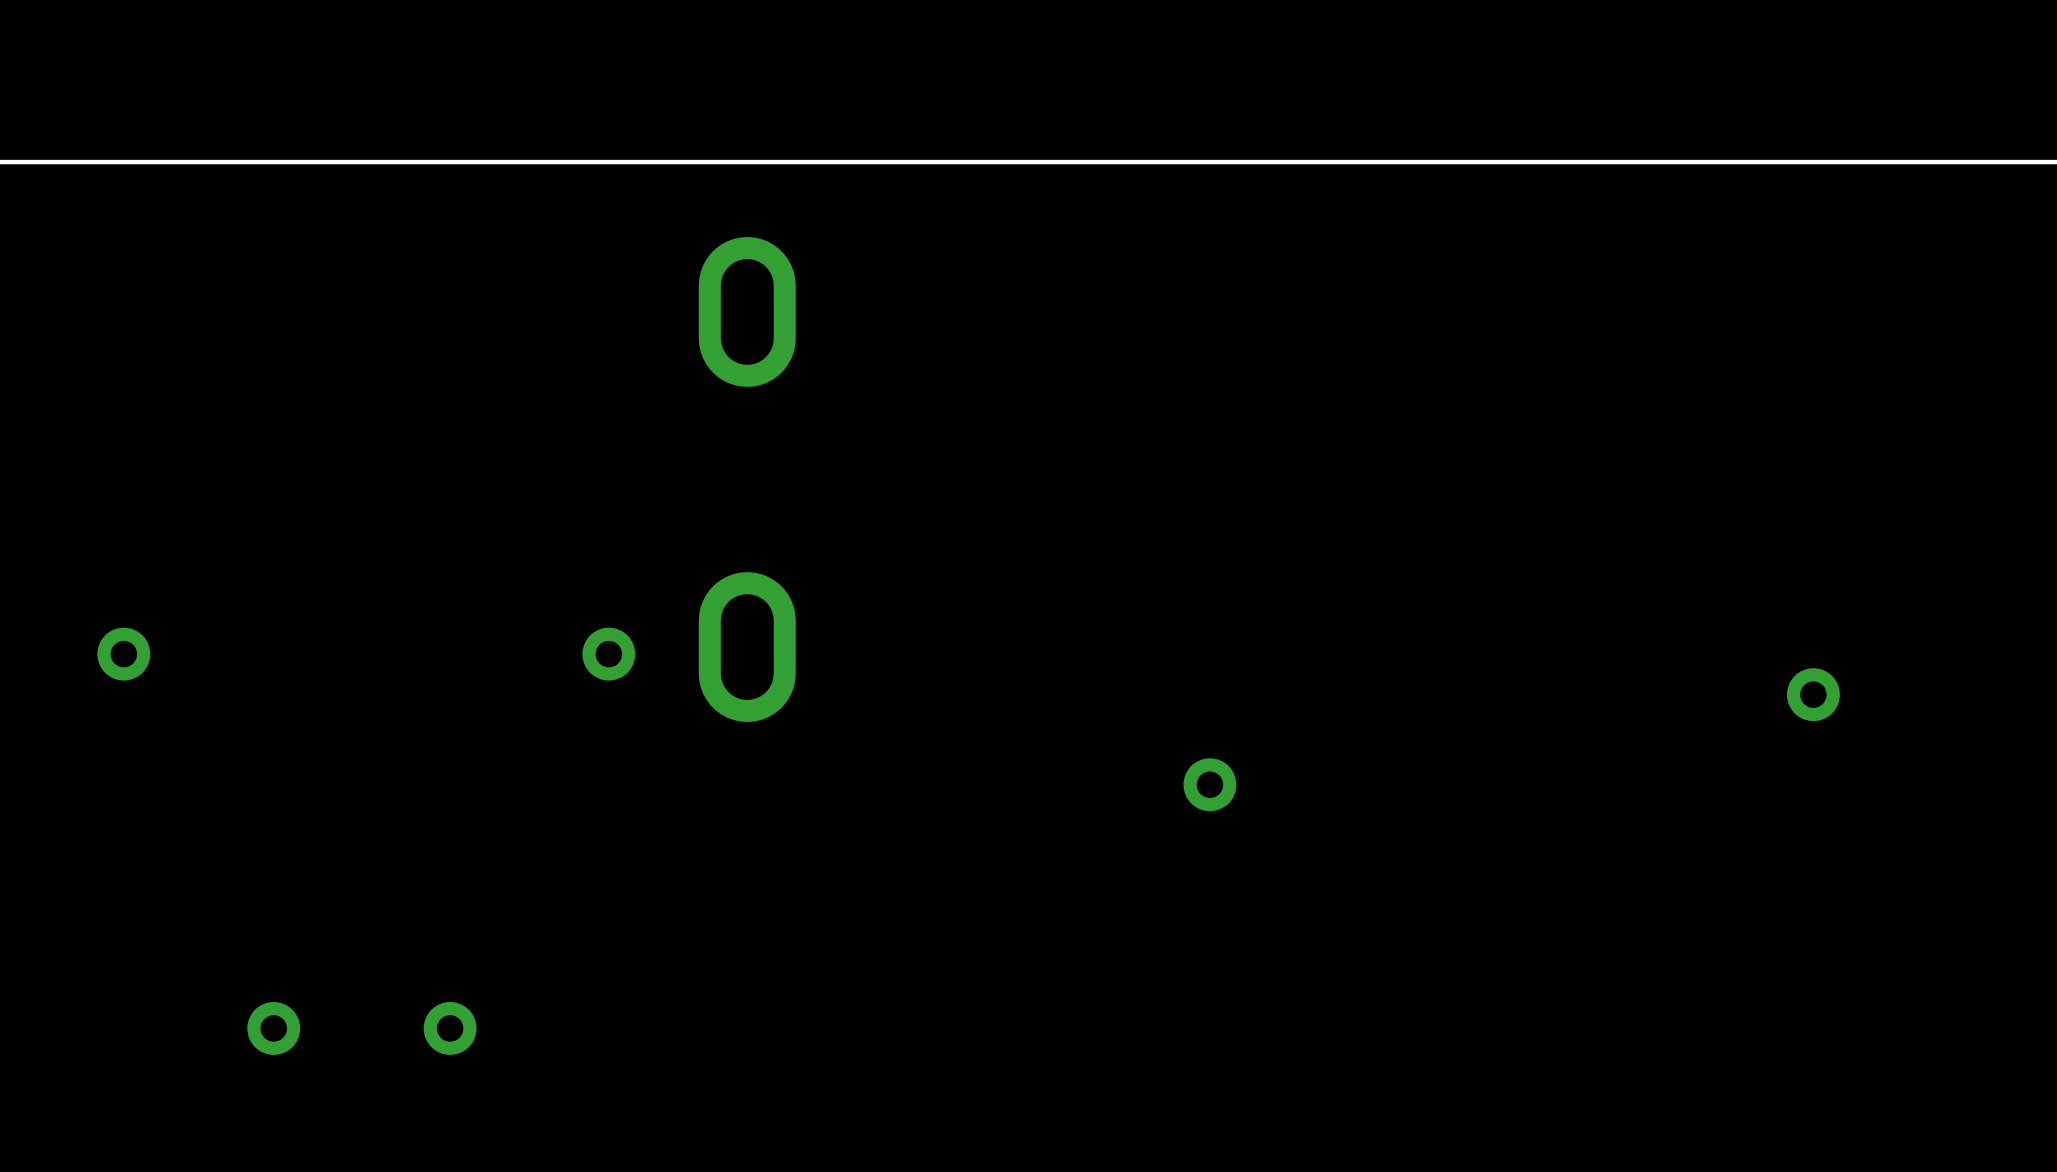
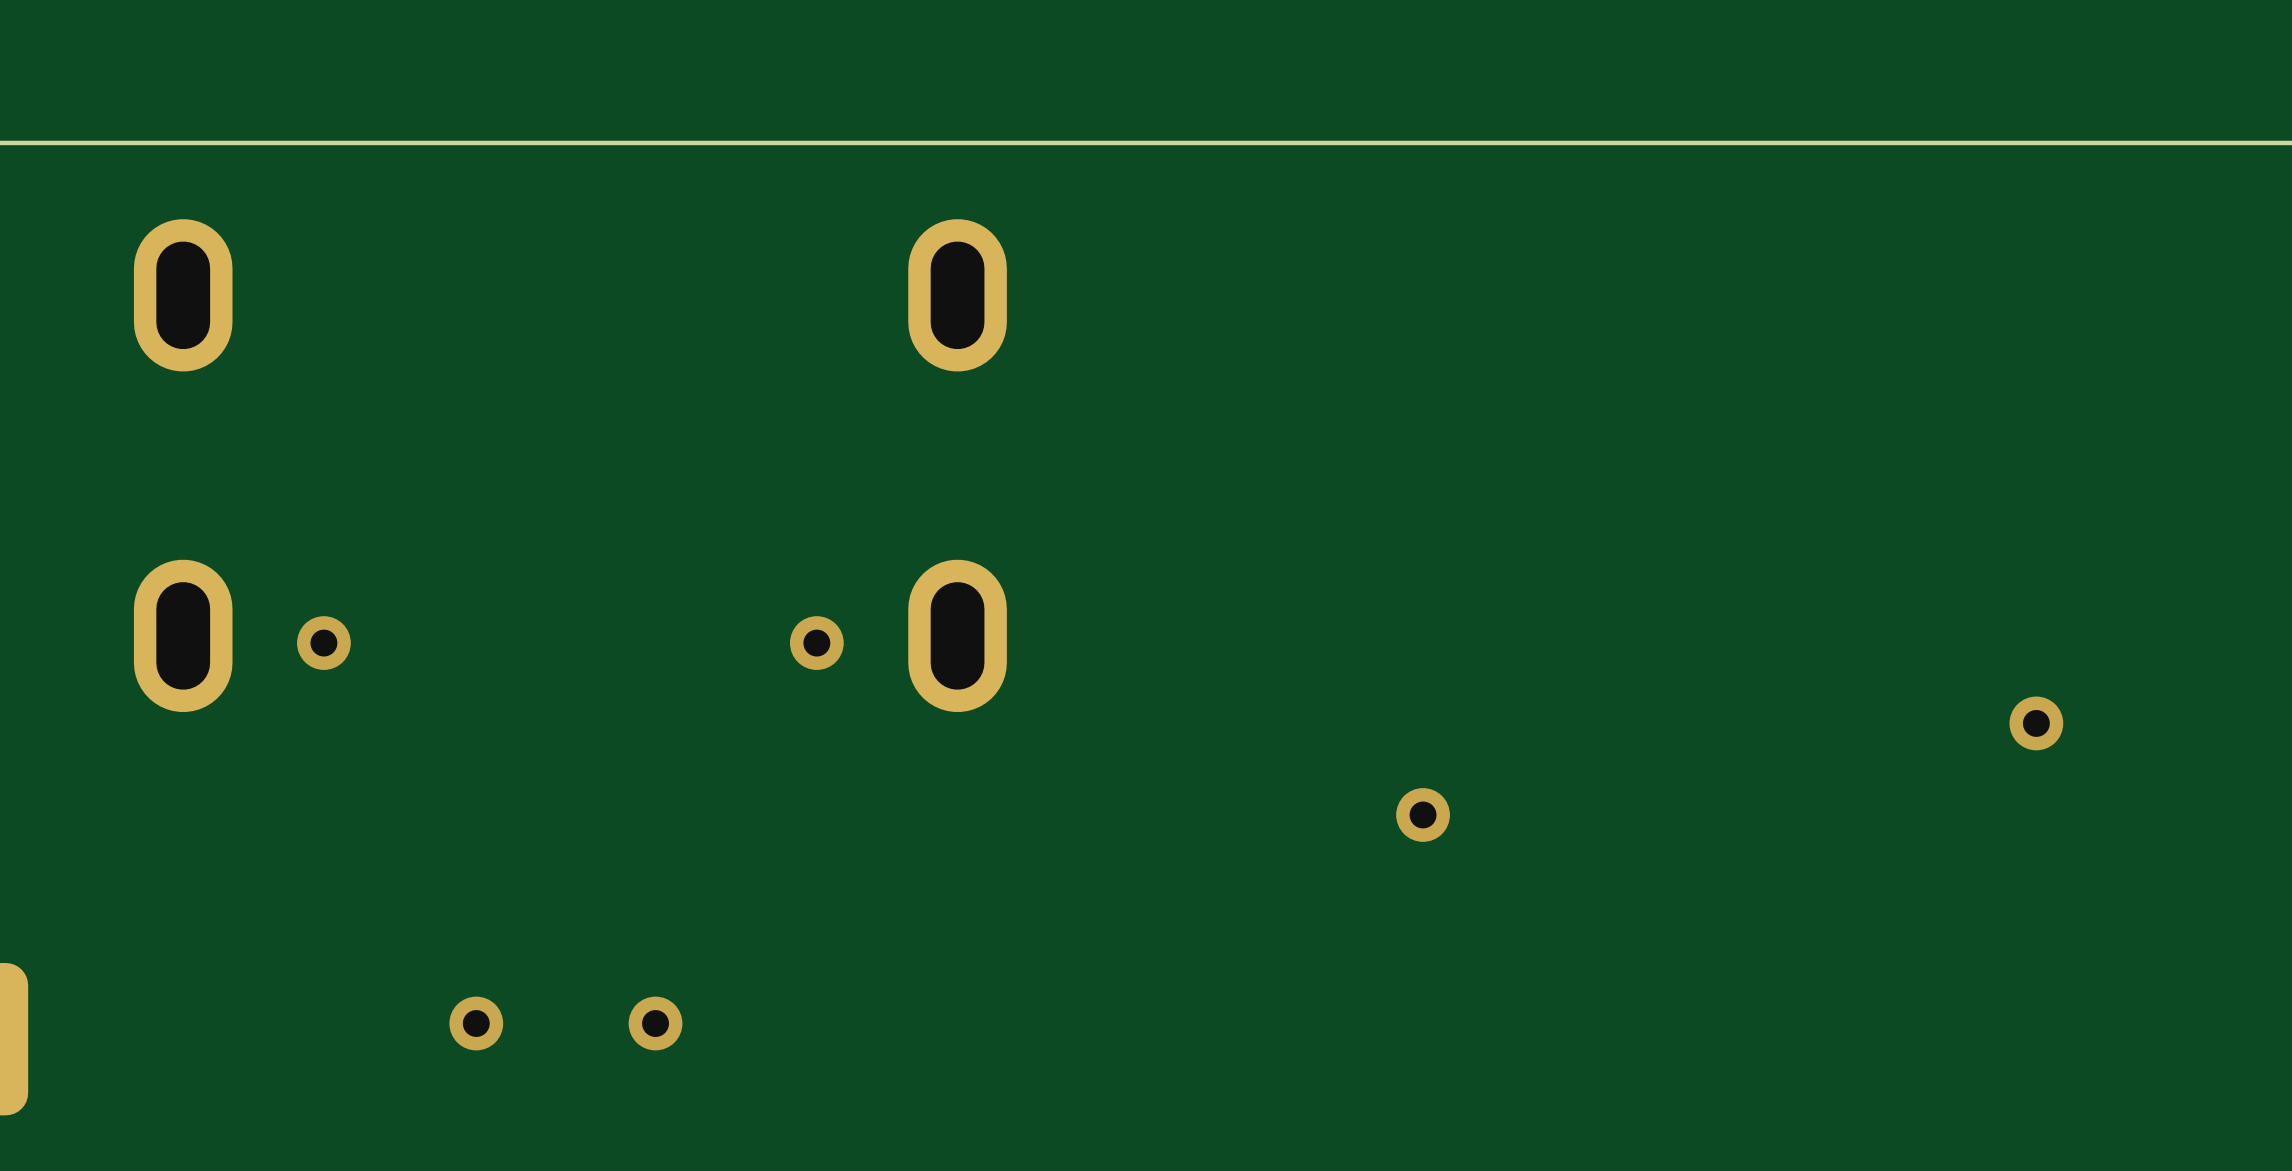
via position: (1813, 694) -> (2036, 723)
via position: (1209, 784) -> (1423, 814)

